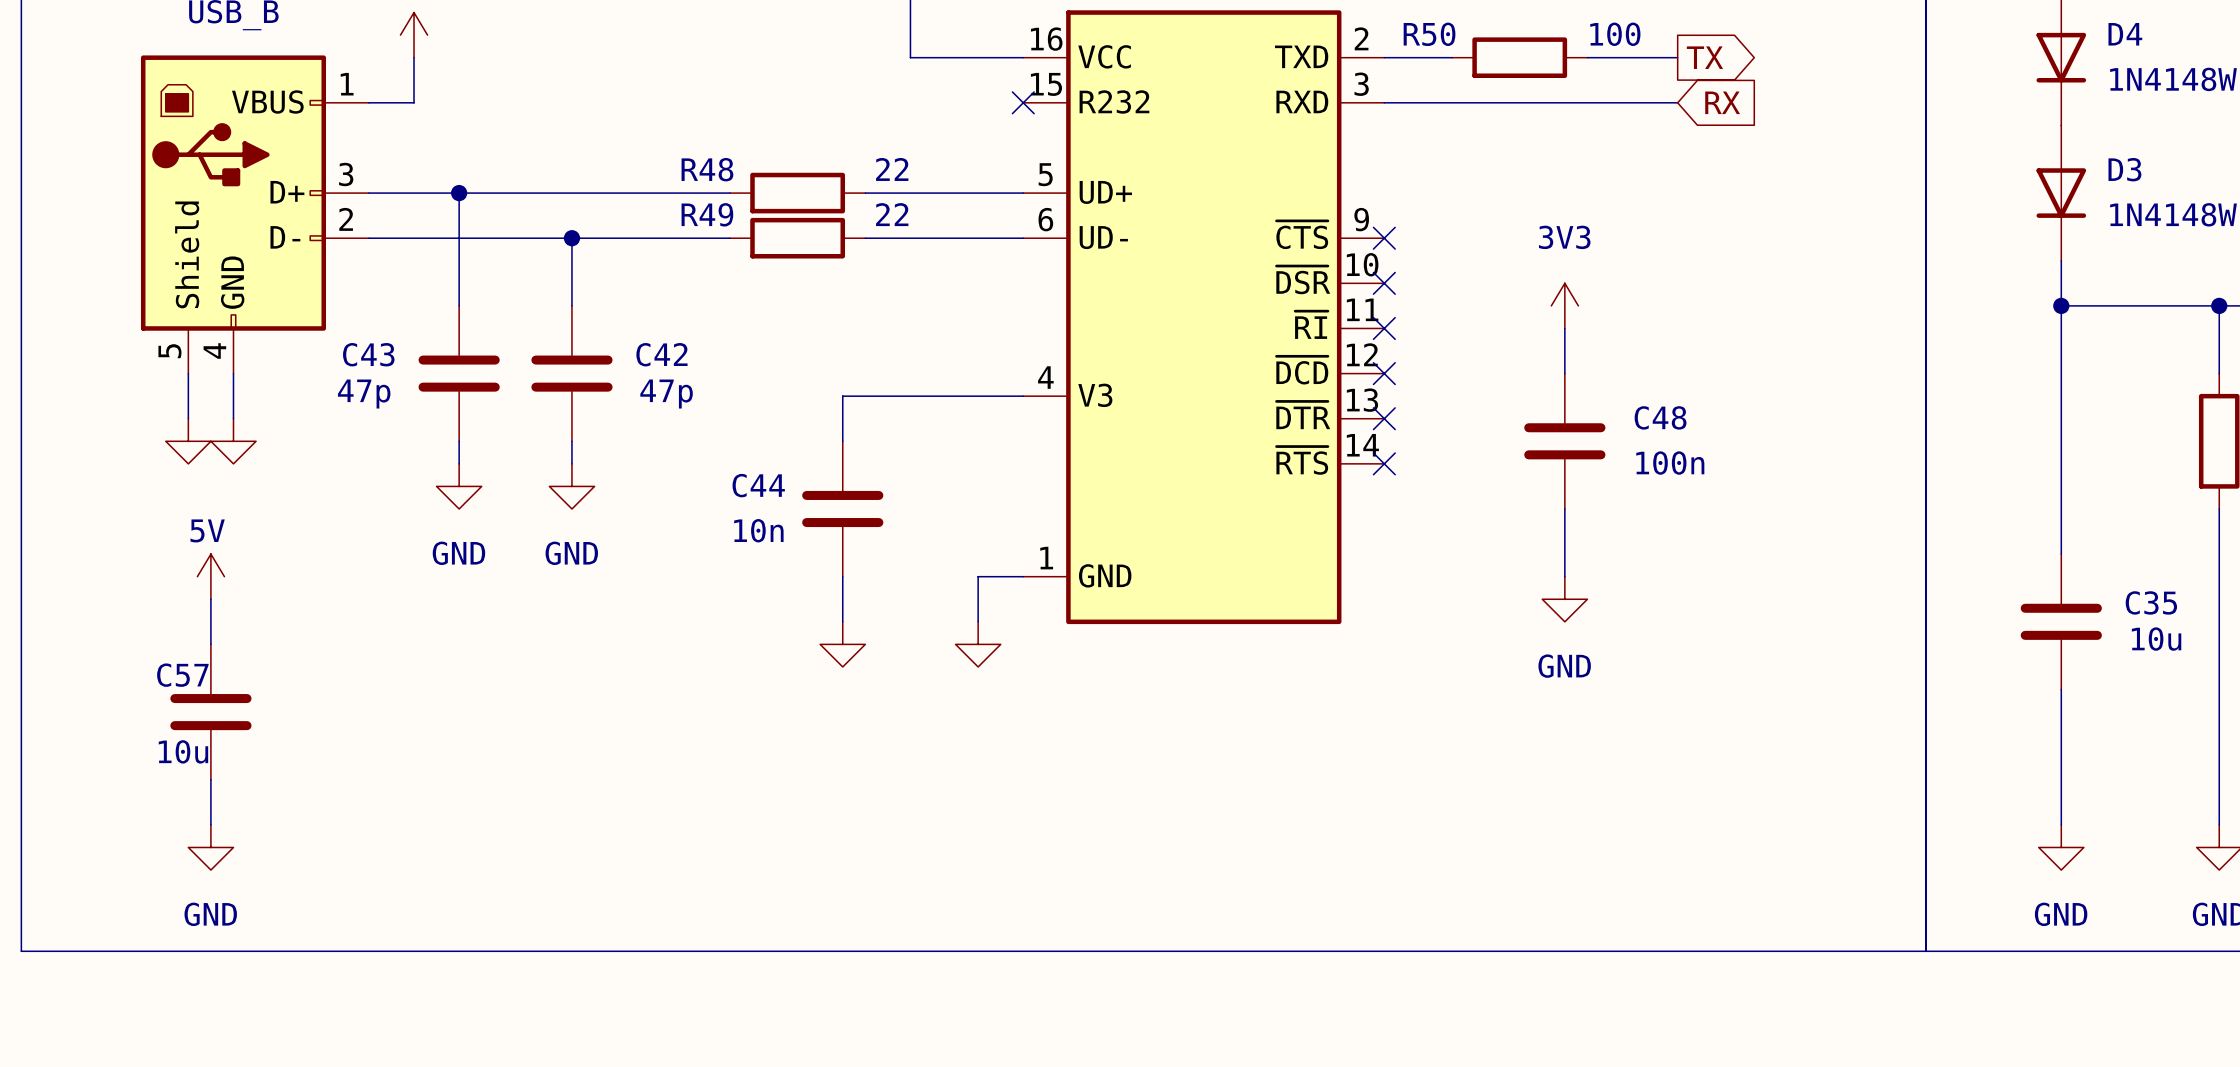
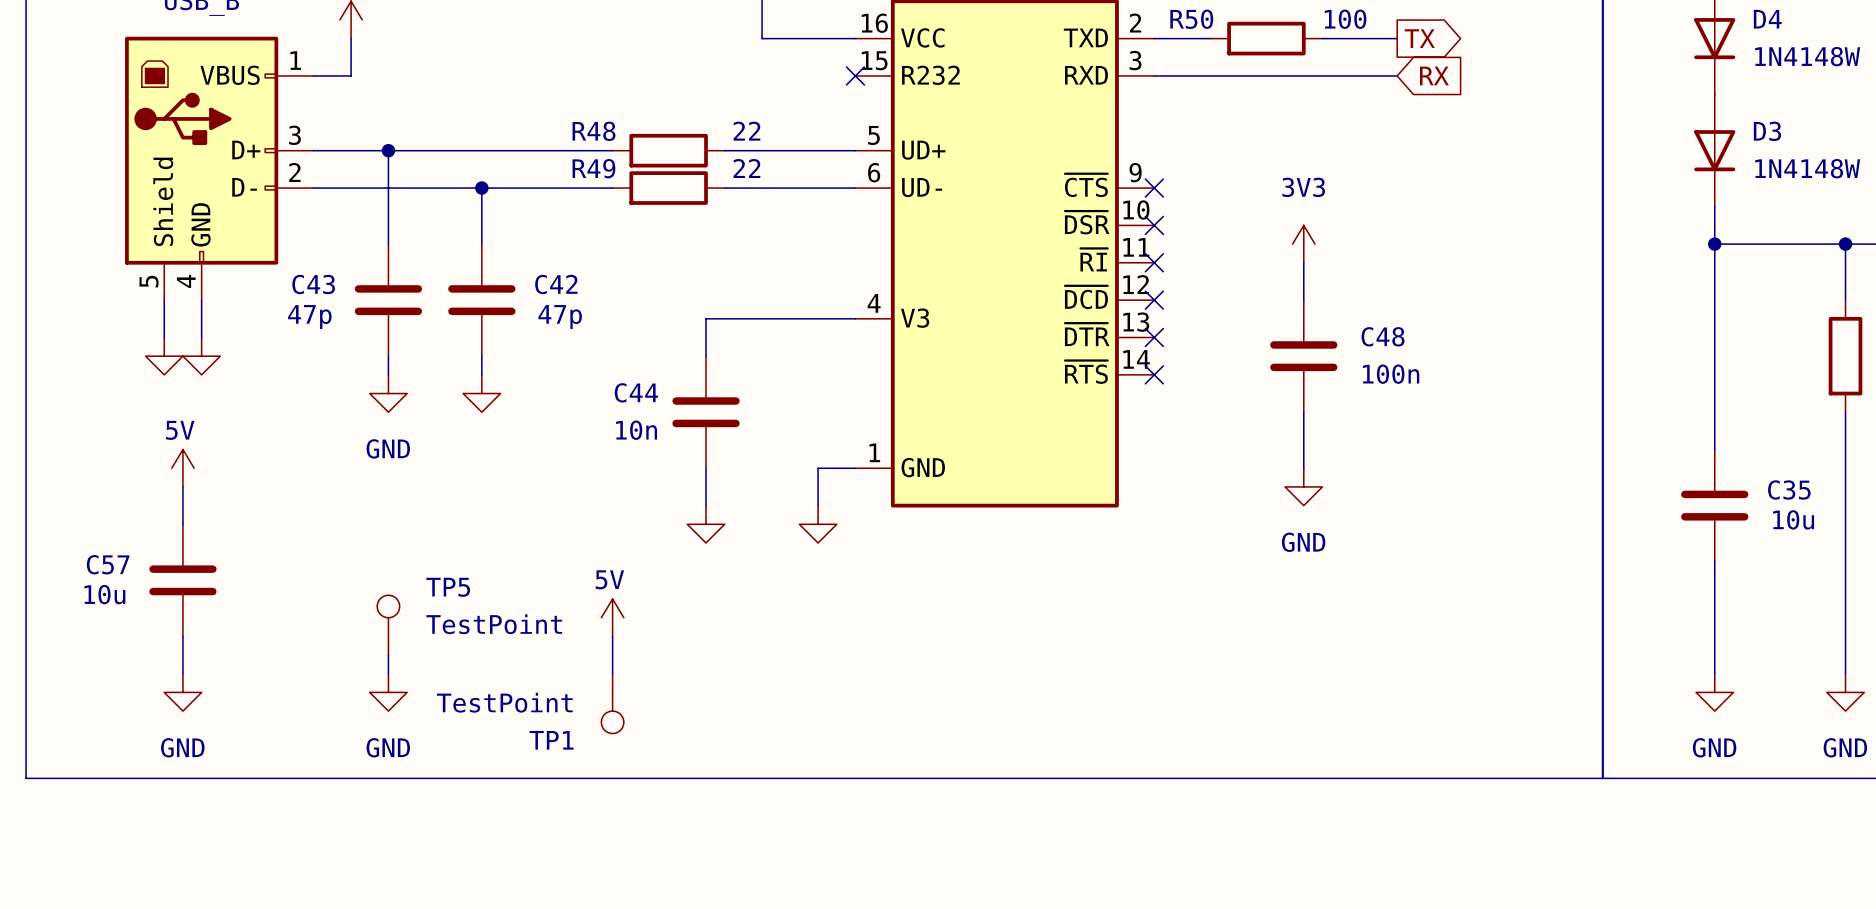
power symbol text: GND (571, 553) -> none
C57 name position: C57 (182, 675) -> C57 (108, 564)
C57 value position: 10u (183, 751) -> 10u (104, 594)
power symbol: none -> 5V (612, 617)
TP5: none -> TestPoint (388, 625)
wire: none -> (612, 636) (612, 673)
wire: none -> (388, 655) (388, 673)
power symbol: none -> GND (388, 692)
TP1: none -> TestPoint (612, 703)

